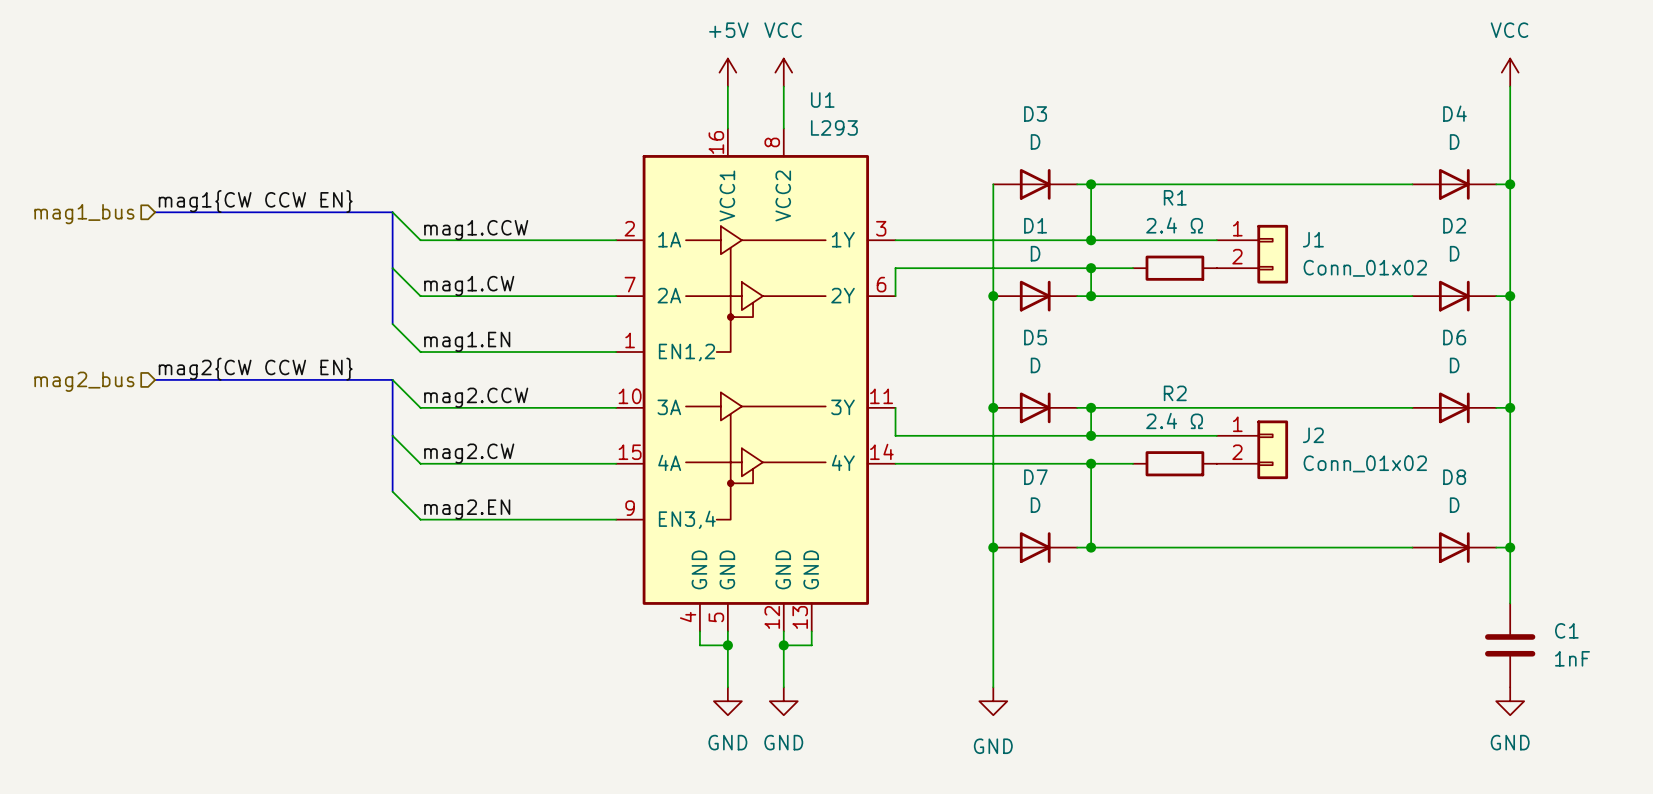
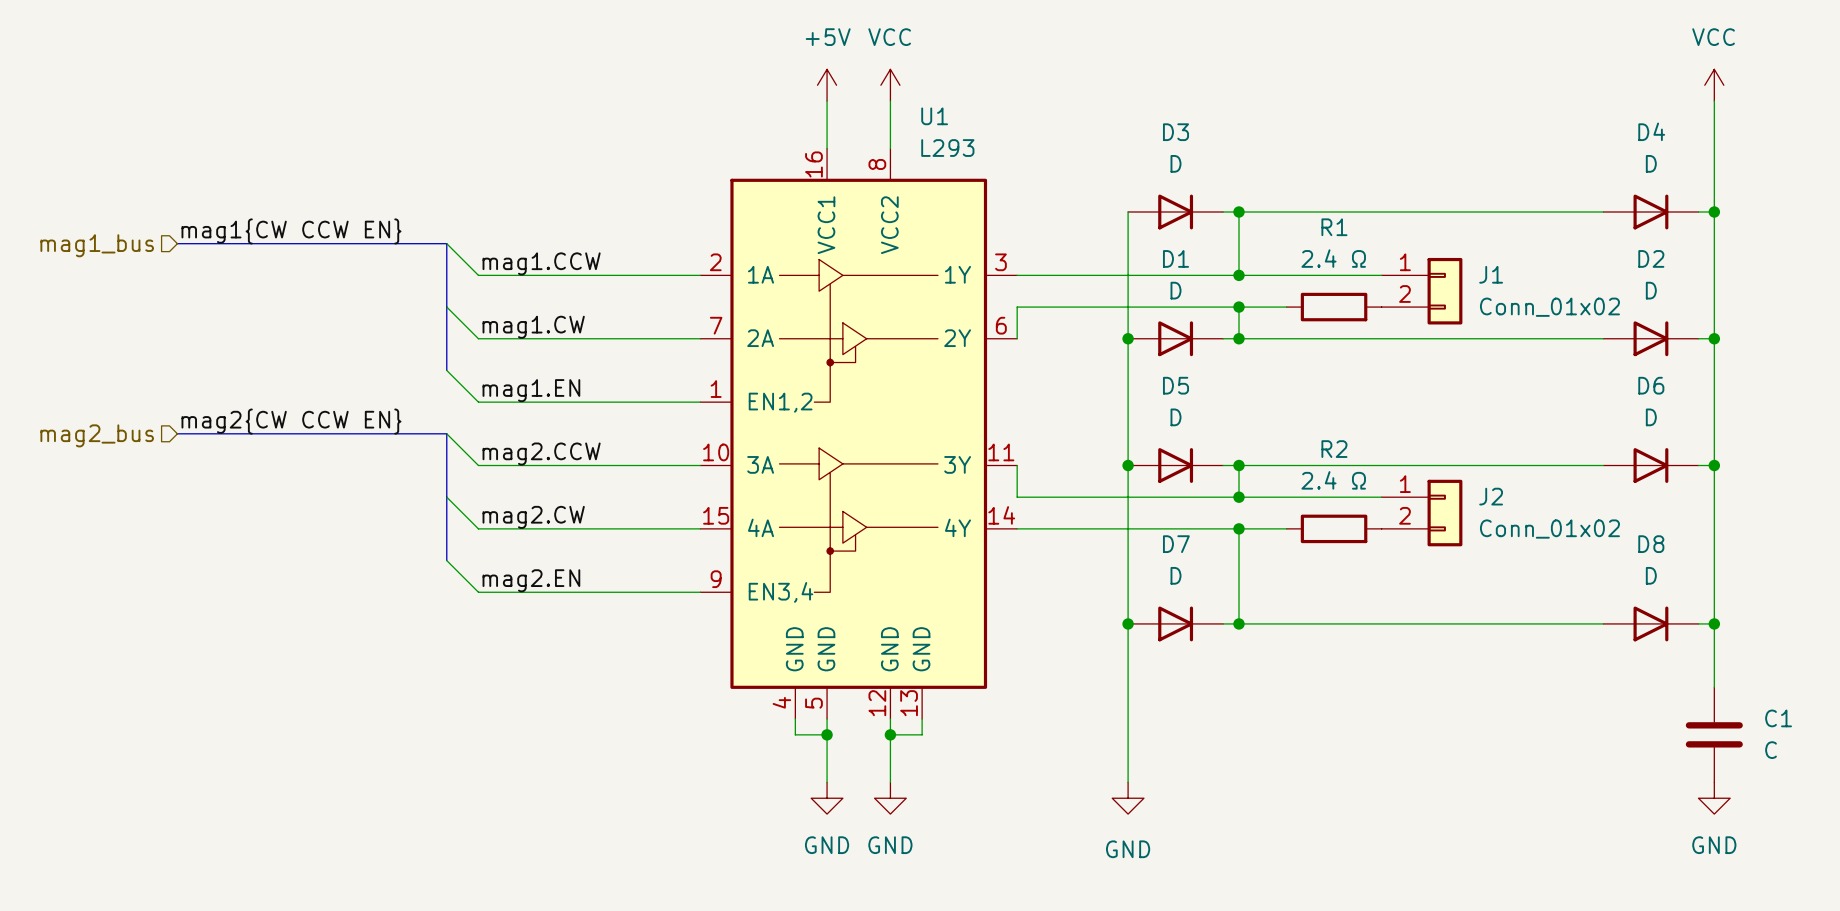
C1 value: 1nF (1572, 658) -> C (1771, 750)

